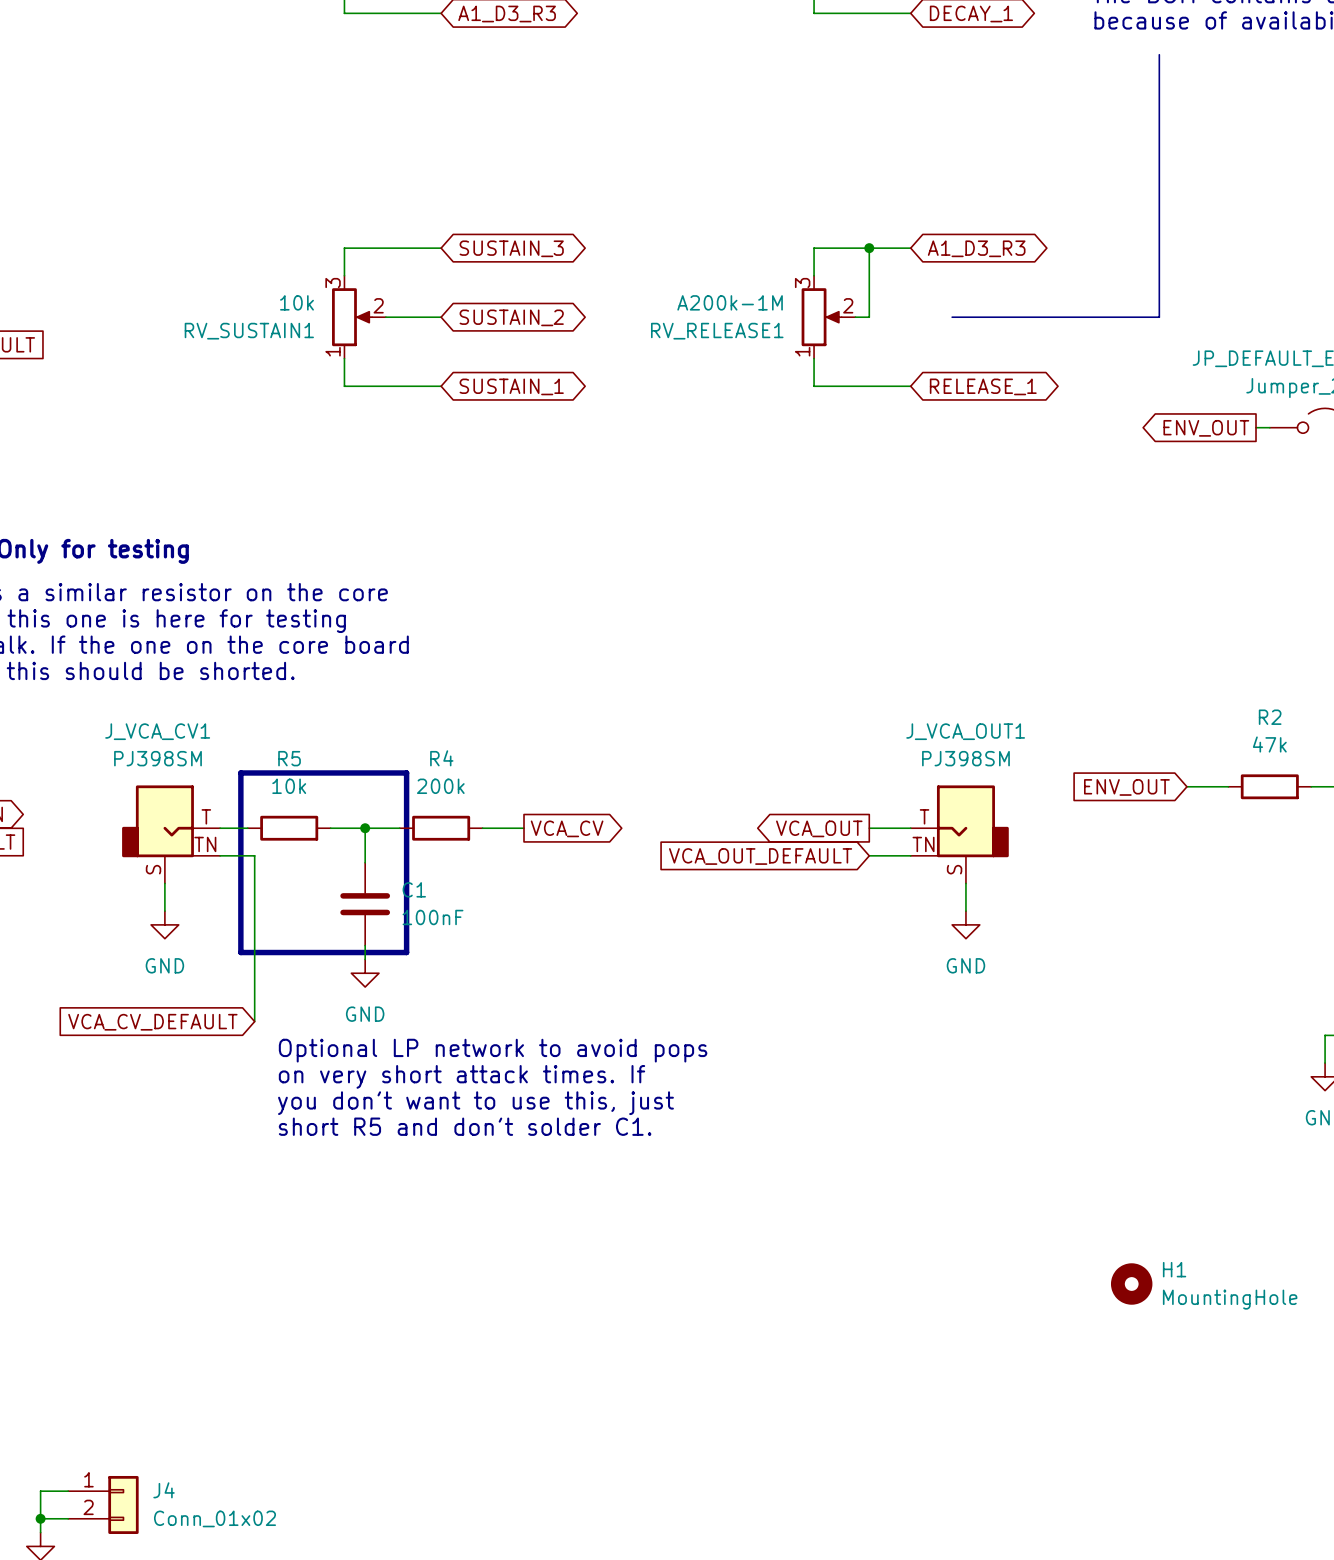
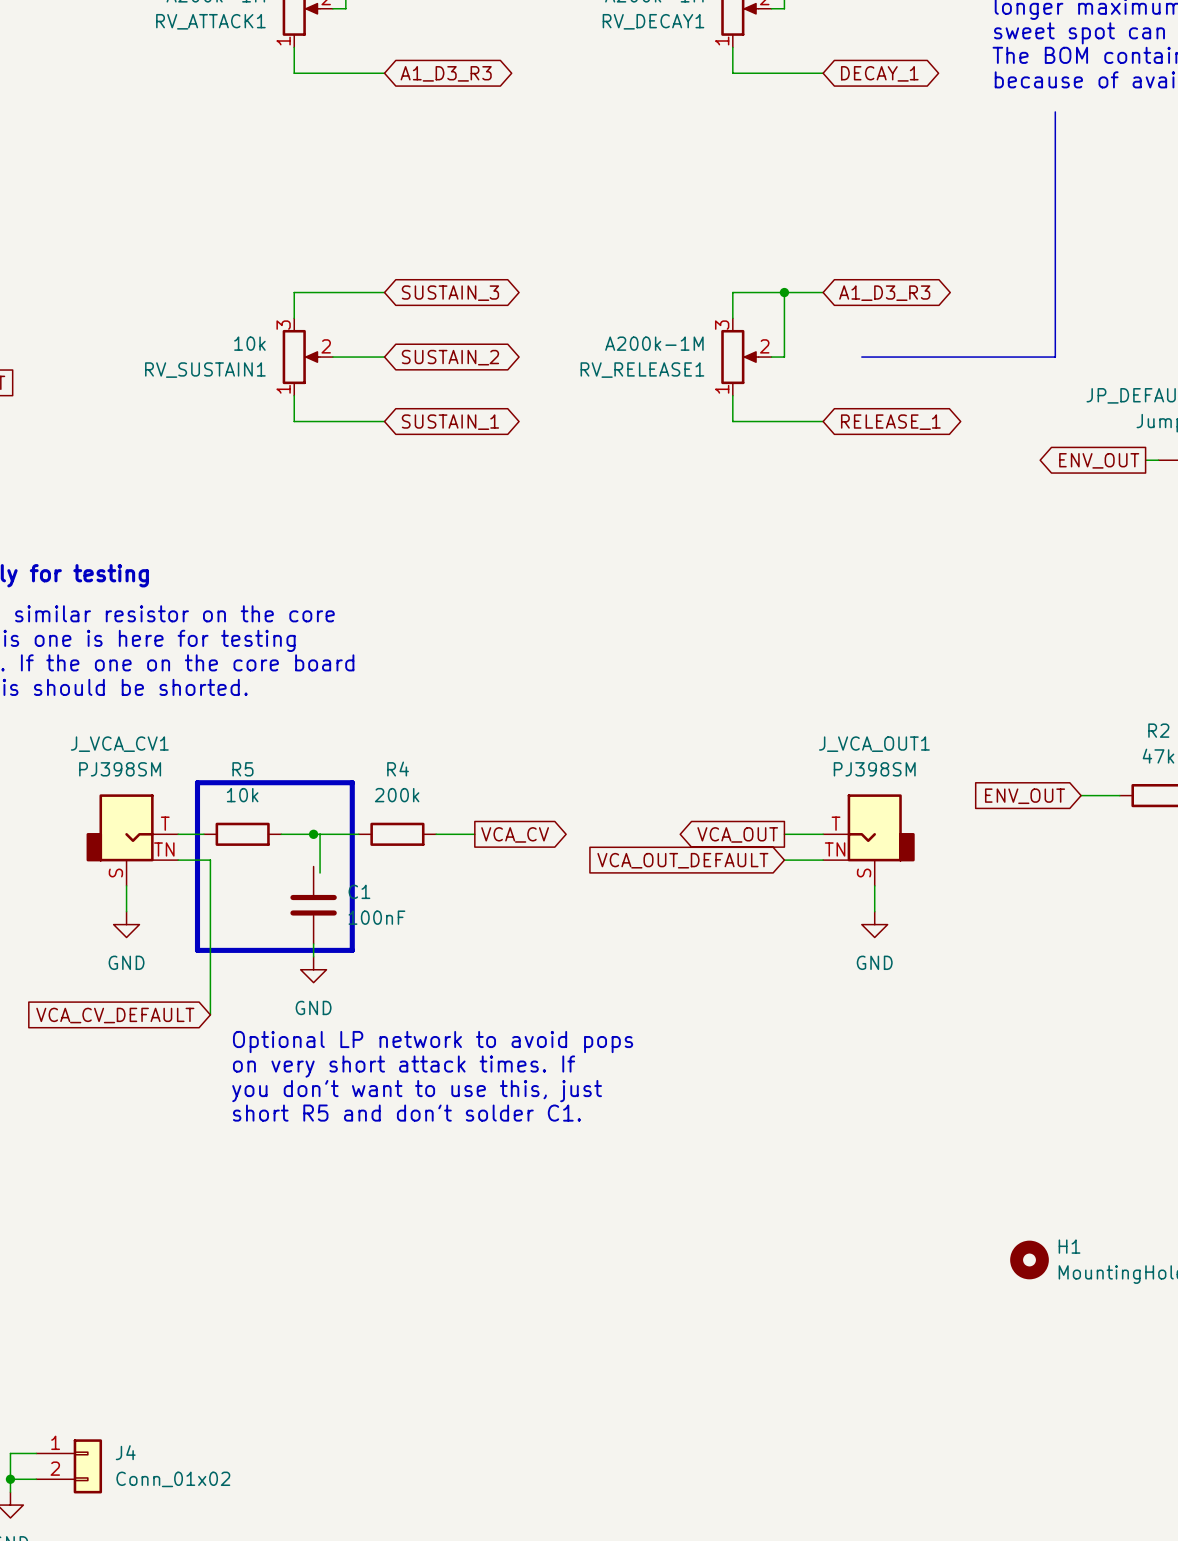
wire: (365, 828) (365, 862) -> none
wire: none -> (320, 834) (320, 873)
R4 position: (441, 828) -> (397, 834)
global label position: VCA_CV (567, 828) -> VCA_CV (515, 834)

